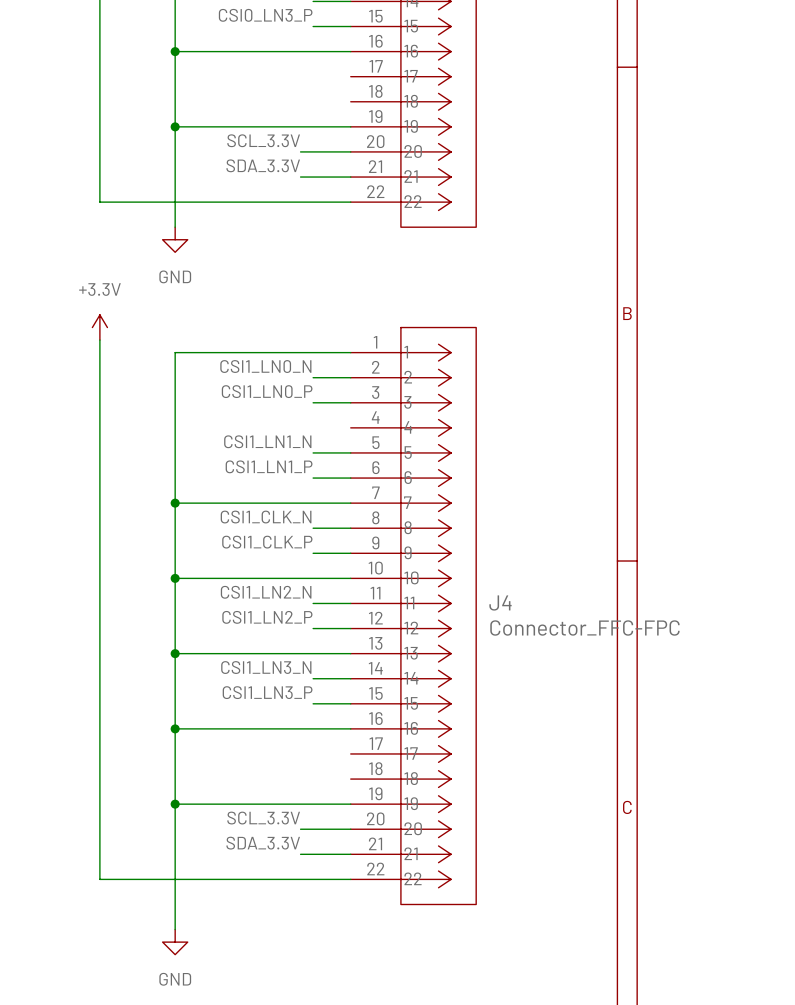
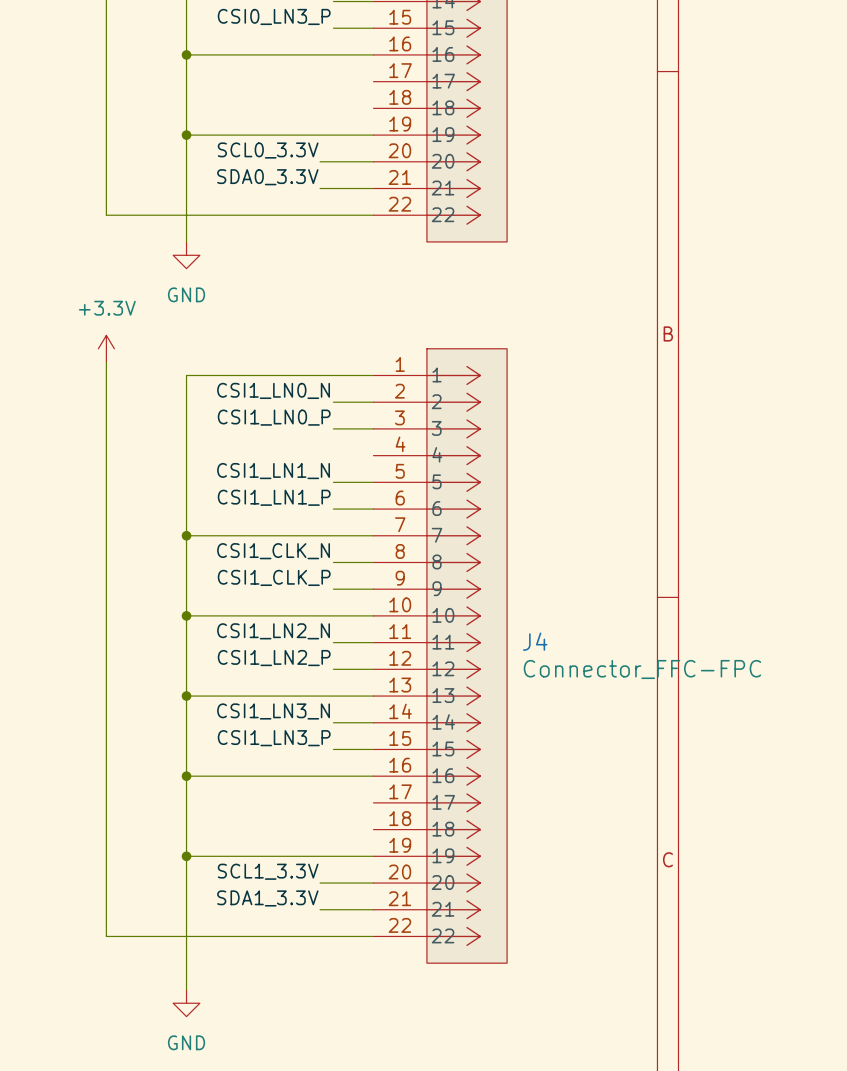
label: SCL_3.3V (263, 140) -> SCL0_3.3V (268, 150)
label: SDA_3.3V (263, 165) -> SDA0_3.3V (267, 177)
label: SCL_3.3V (263, 818) -> SCL1_3.3V (268, 871)
label: SDA_3.3V (263, 843) -> SDA1_3.3V (267, 898)

